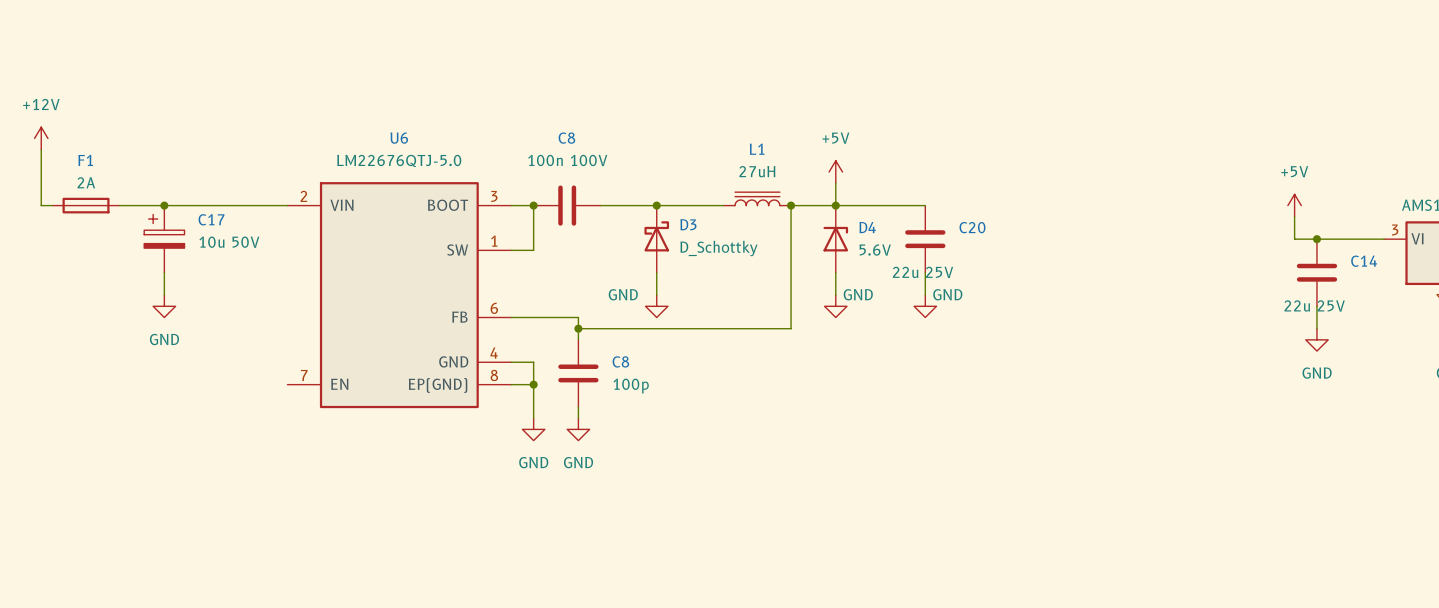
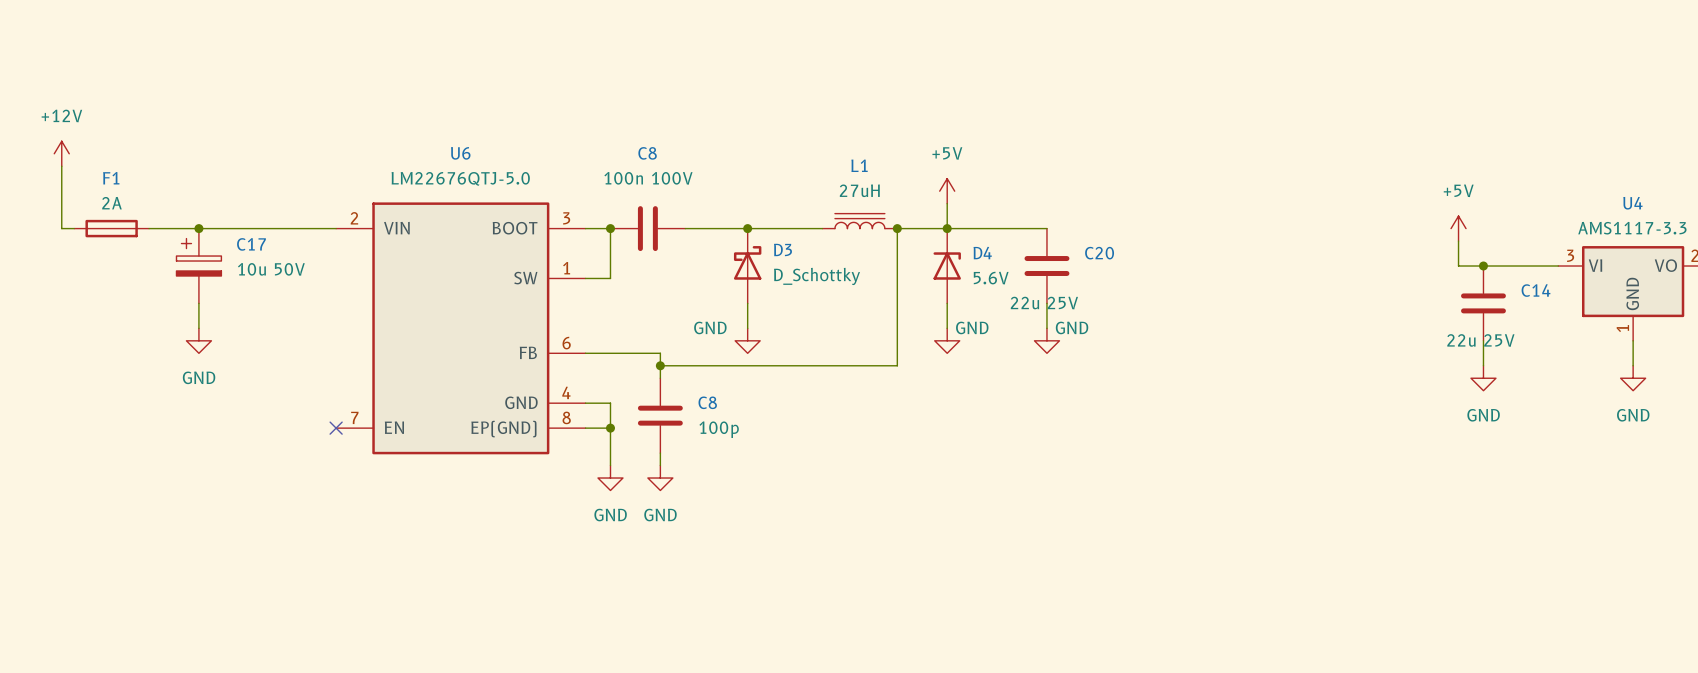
no-connect mark: none -> (336, 428)

